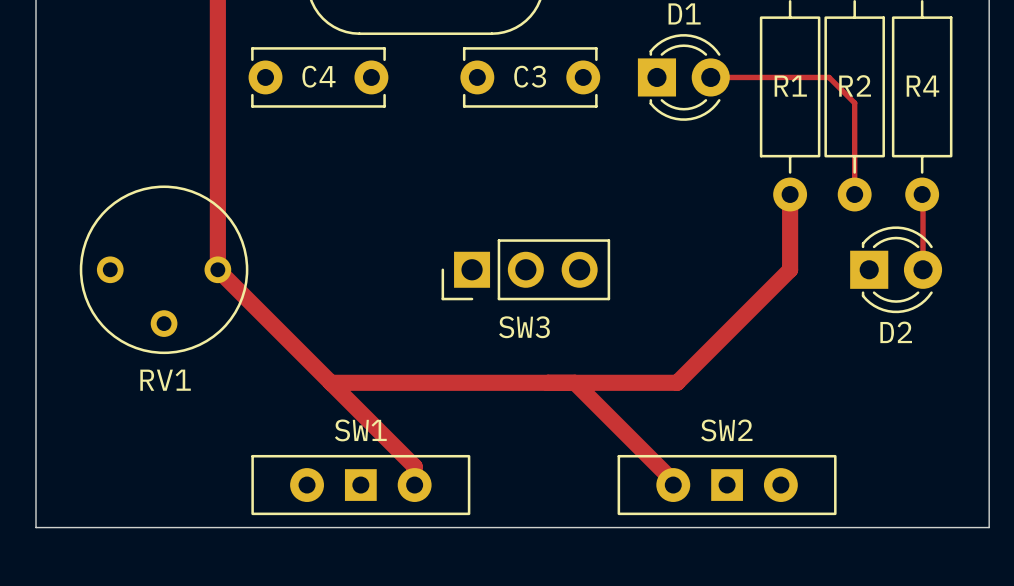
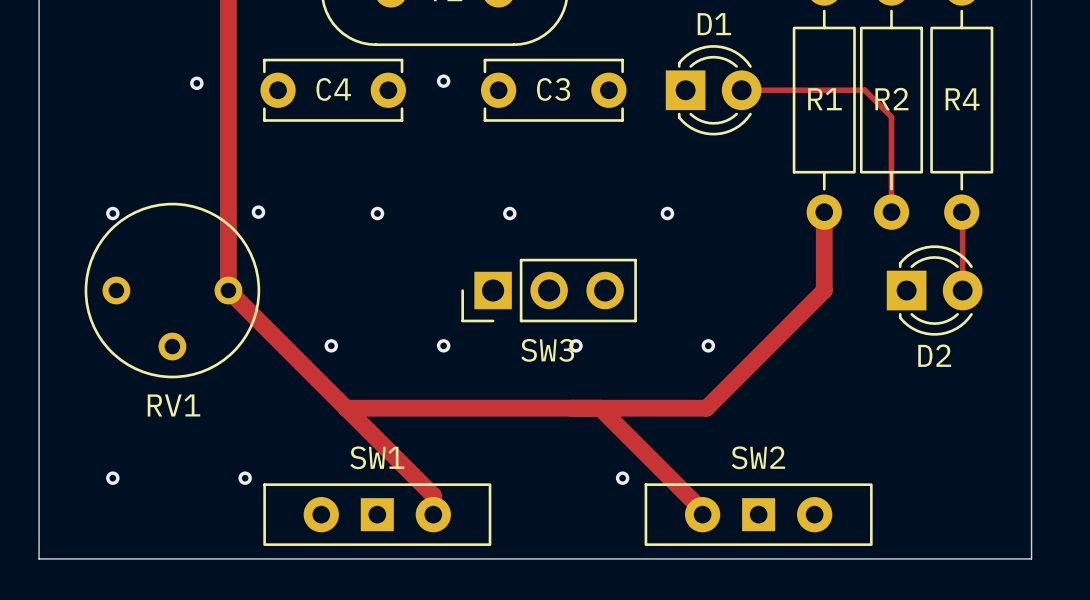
via: none -> (443, 81)
via: none -> (196, 83)
via: none -> (258, 212)
via: none -> (112, 213)
via: none -> (377, 213)
via: none -> (509, 213)
via: none -> (667, 213)
via: none -> (331, 345)
via: none -> (443, 345)
via: none -> (575, 345)
via: none -> (708, 345)
via: none -> (112, 478)
via: none -> (245, 478)
via: none -> (622, 478)

